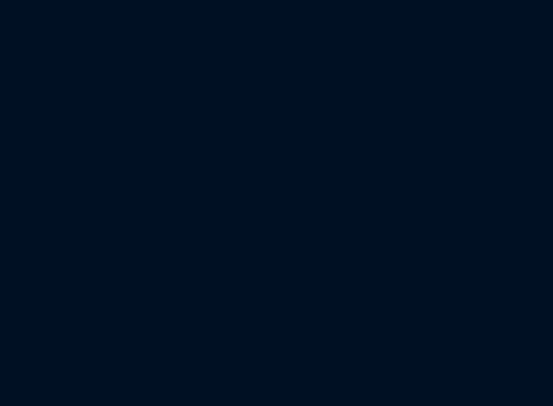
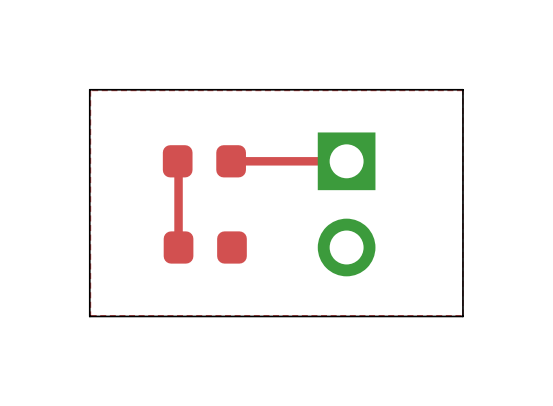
board edge: none -> (462, 89) (462, 316) (89, 316) (89, 89) (462, 89)
top zone outline: none -> (462, 90) (462, 315) (90, 315) (90, 90) (462, 90)
top track: none -> (177, 161) (178, 247)
part: none -> (204, 161)
top track: none -> (346, 161) (231, 161)
part: none -> (346, 204)
part: none -> (205, 247)

